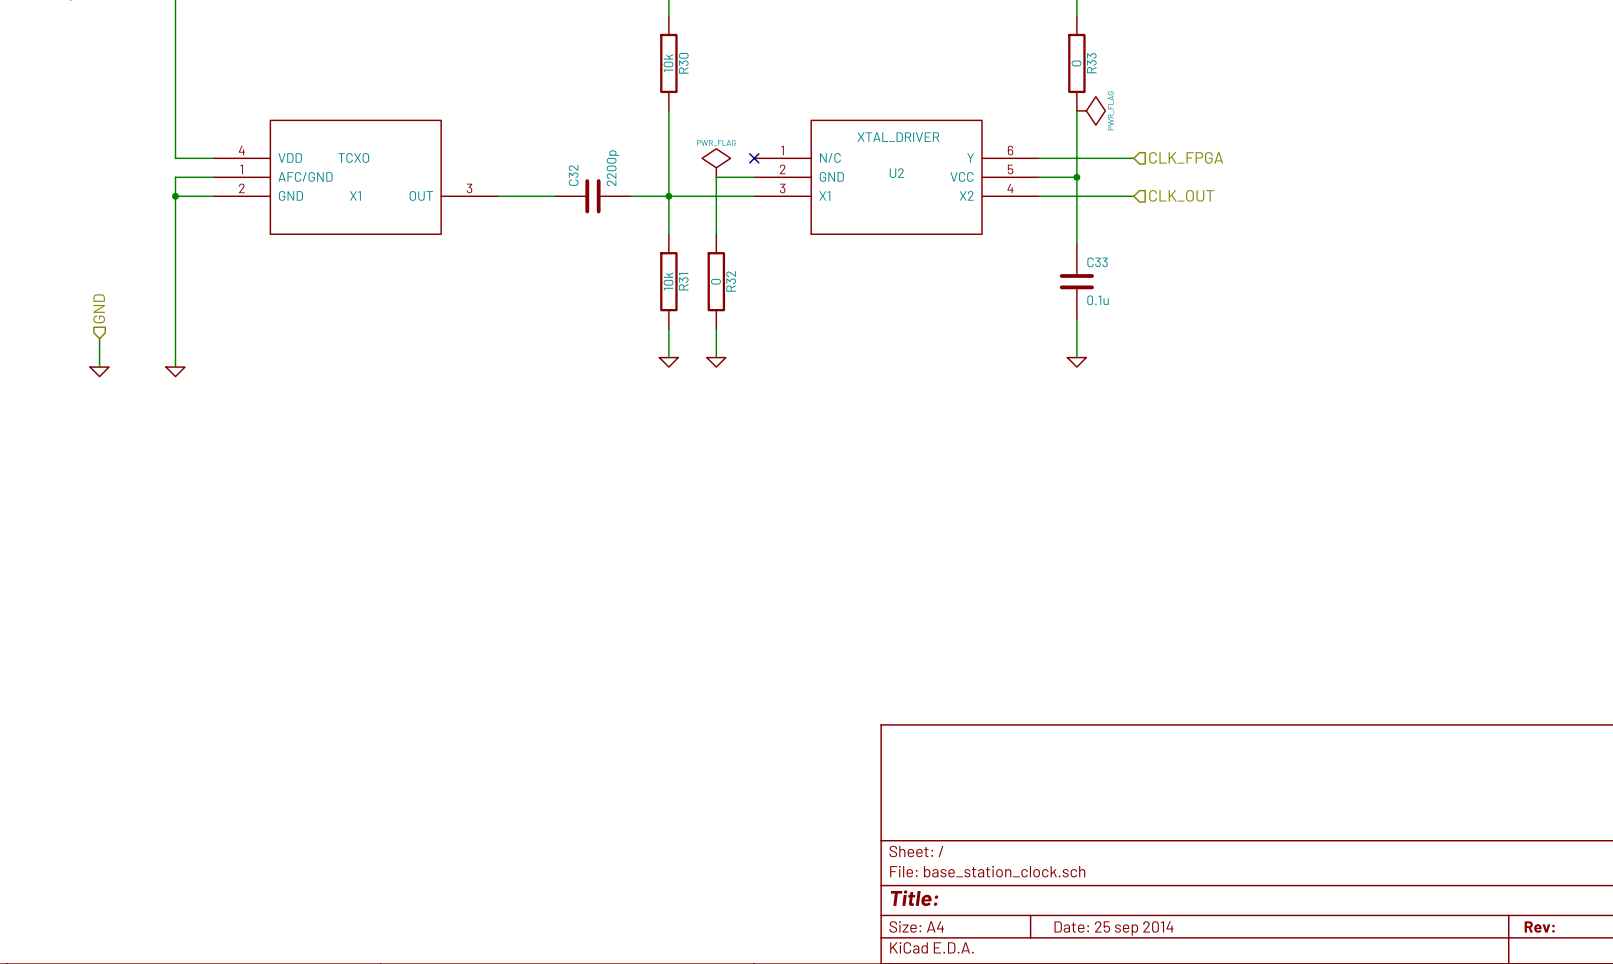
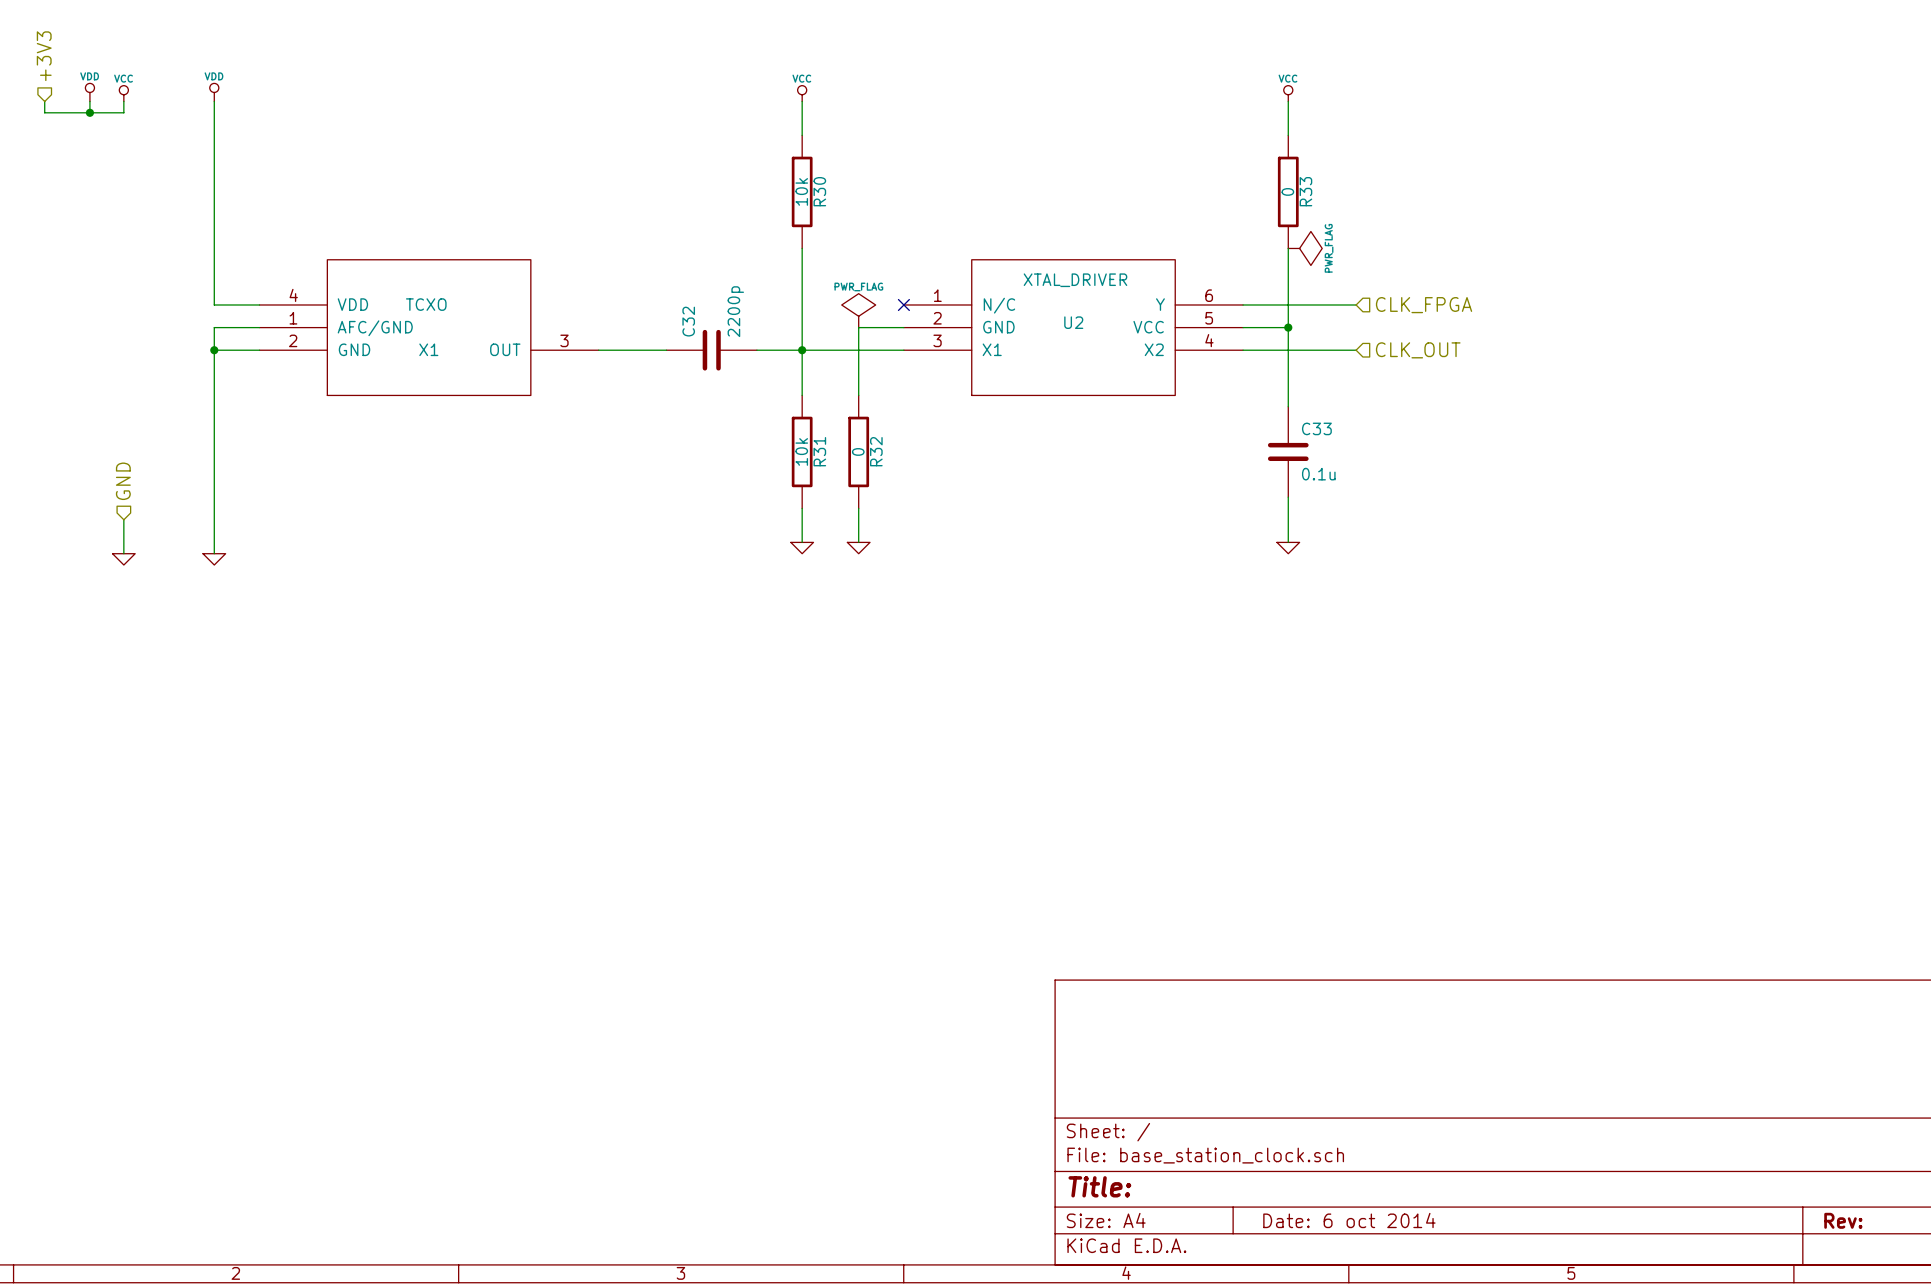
title block: Date: 25 sep 2014 (1113, 928) -> Date: 6 oct 2014 (1349, 1220)

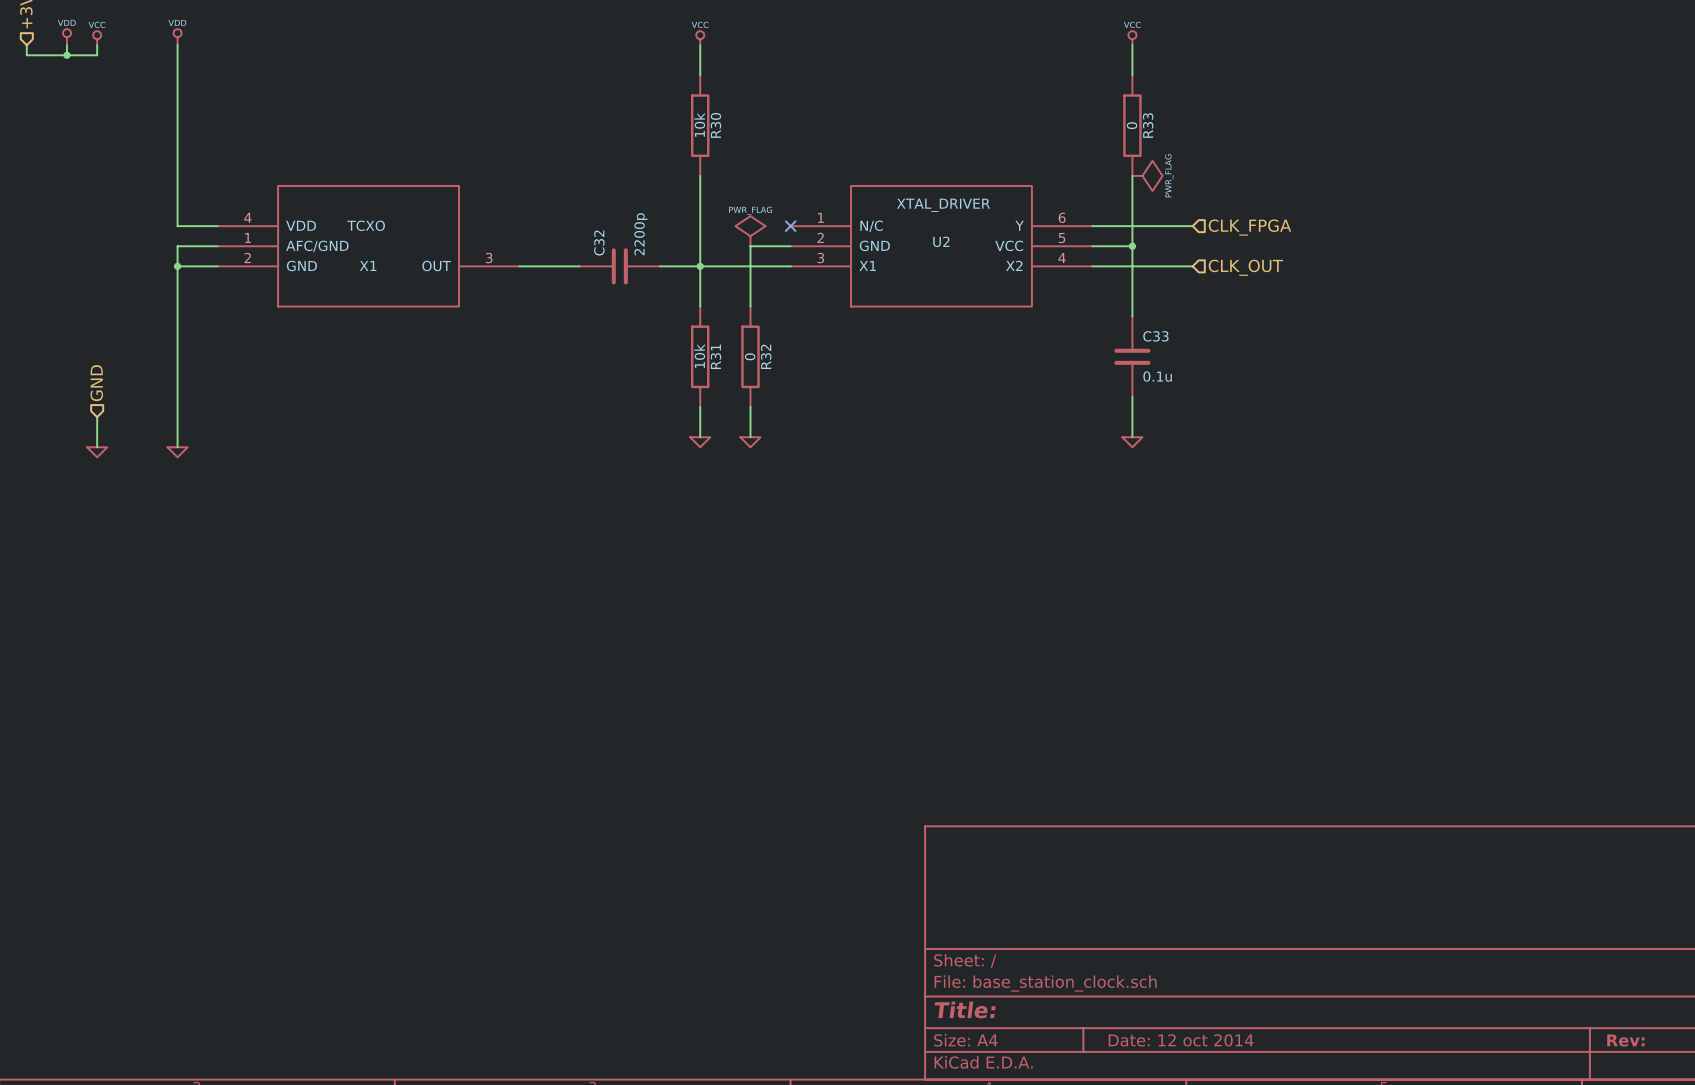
title block: Date: 6 oct 2014 (1349, 1220) -> Date: 12 oct 2014 (1181, 1040)

